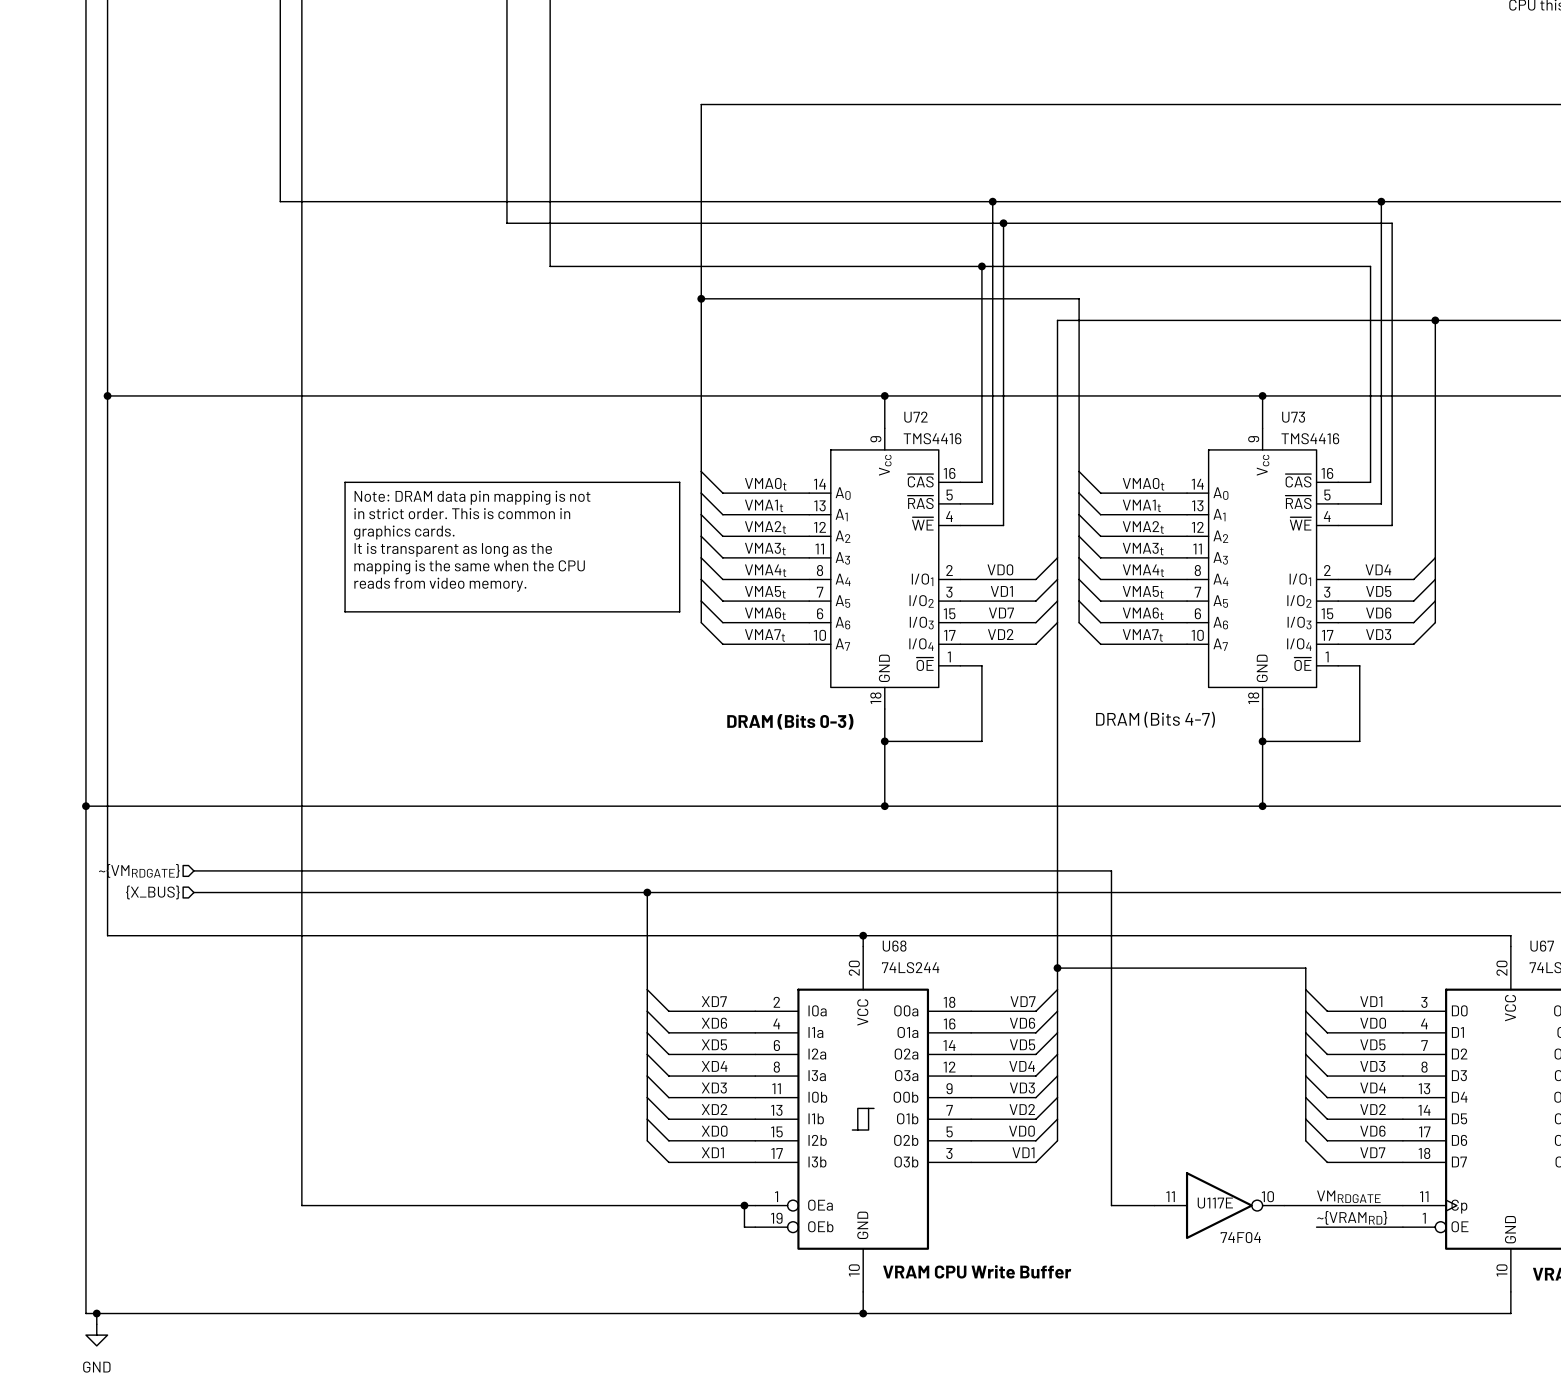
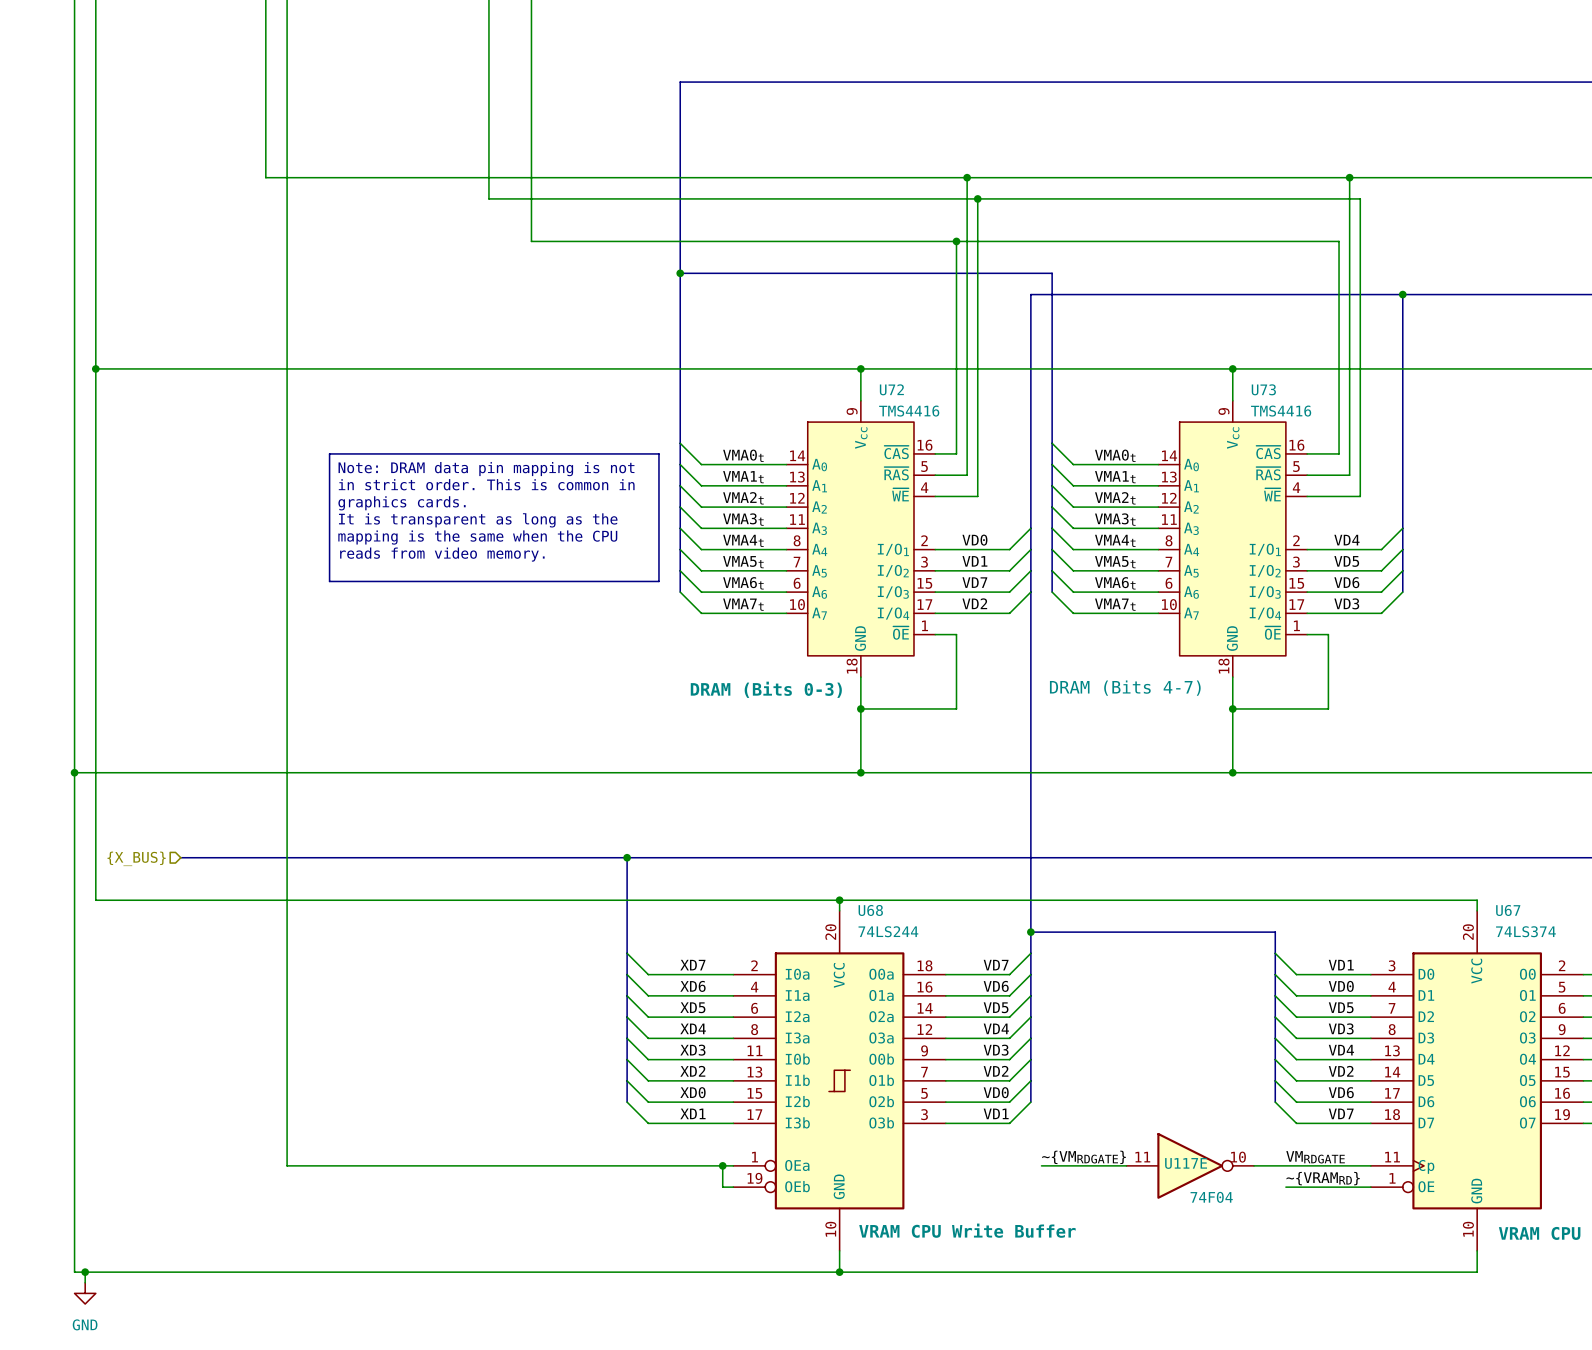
hierarchical label: ~{VMRDGATE} (139, 870) -> none
wire: (193, 870) (1111, 870) (1111, 1205) -> (1041, 1165) (1084, 1165)
label: none -> ~{VMRDGATE} (1084, 1157)

